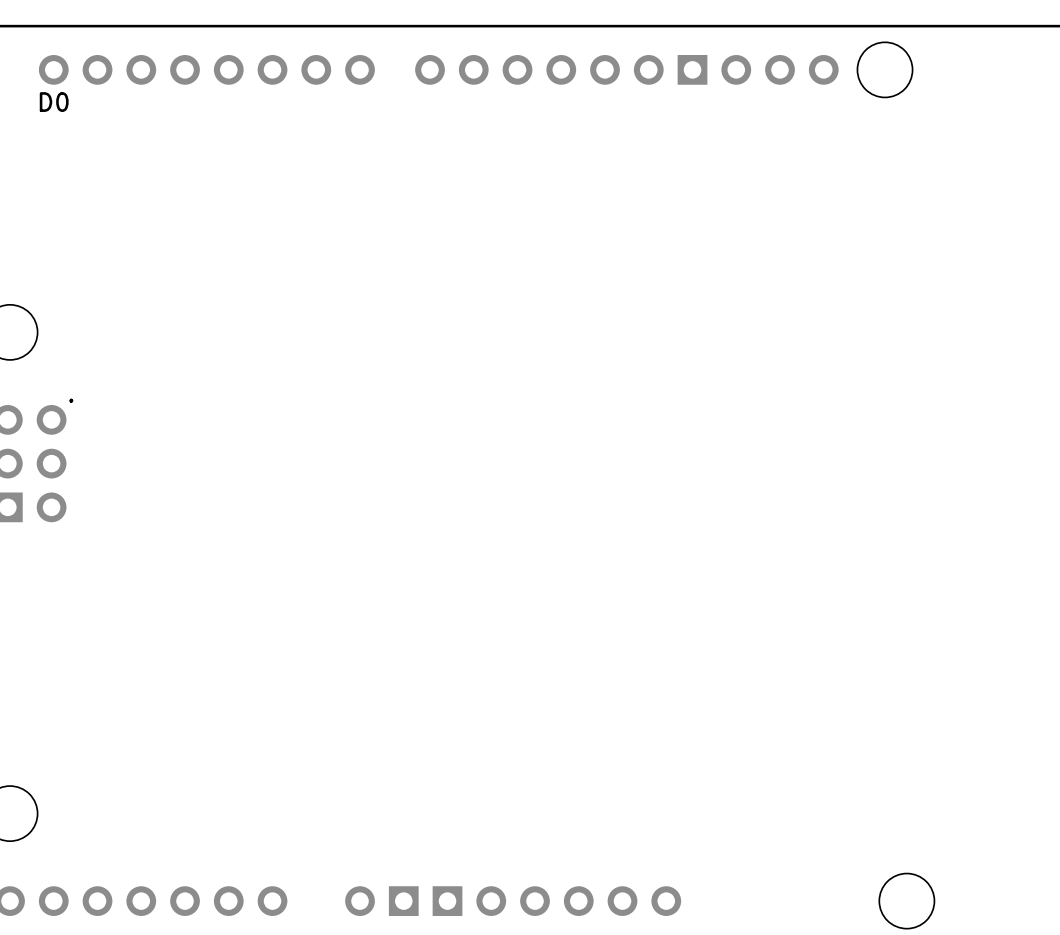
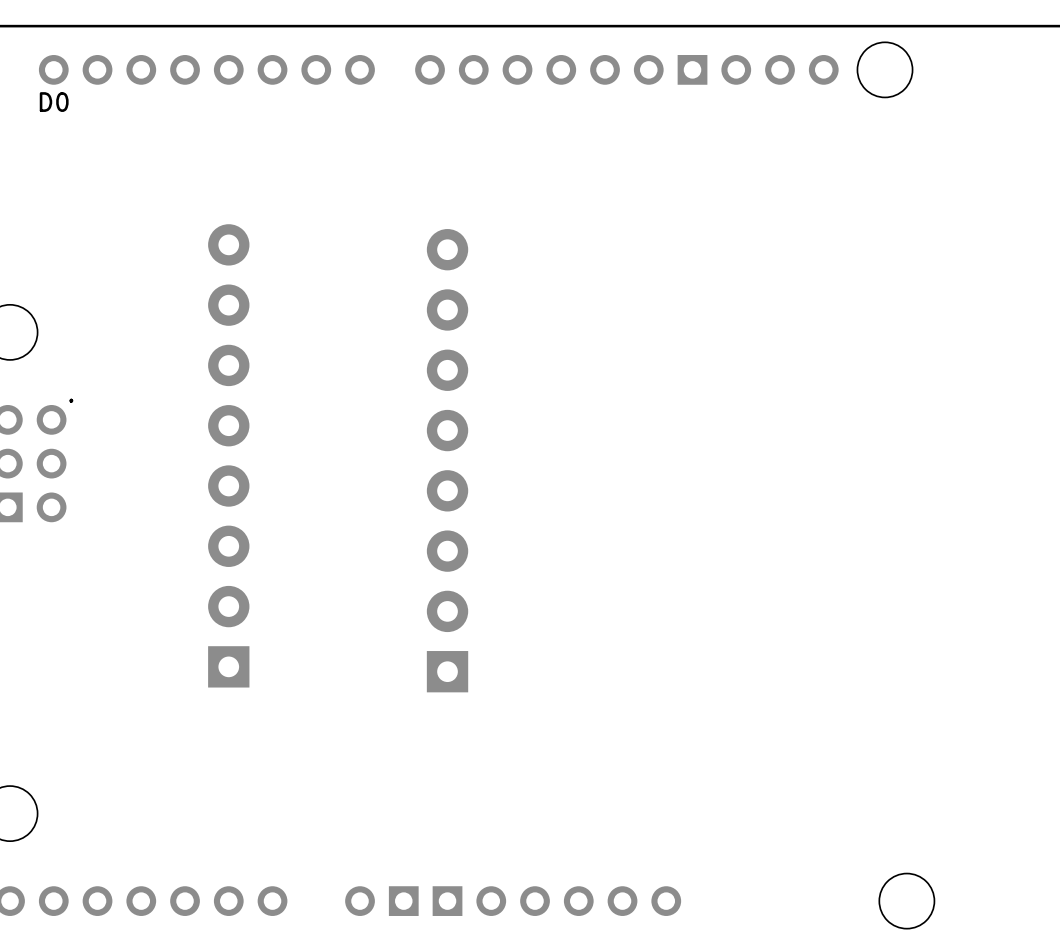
part: none -> (228, 455)
part: none -> (447, 460)

